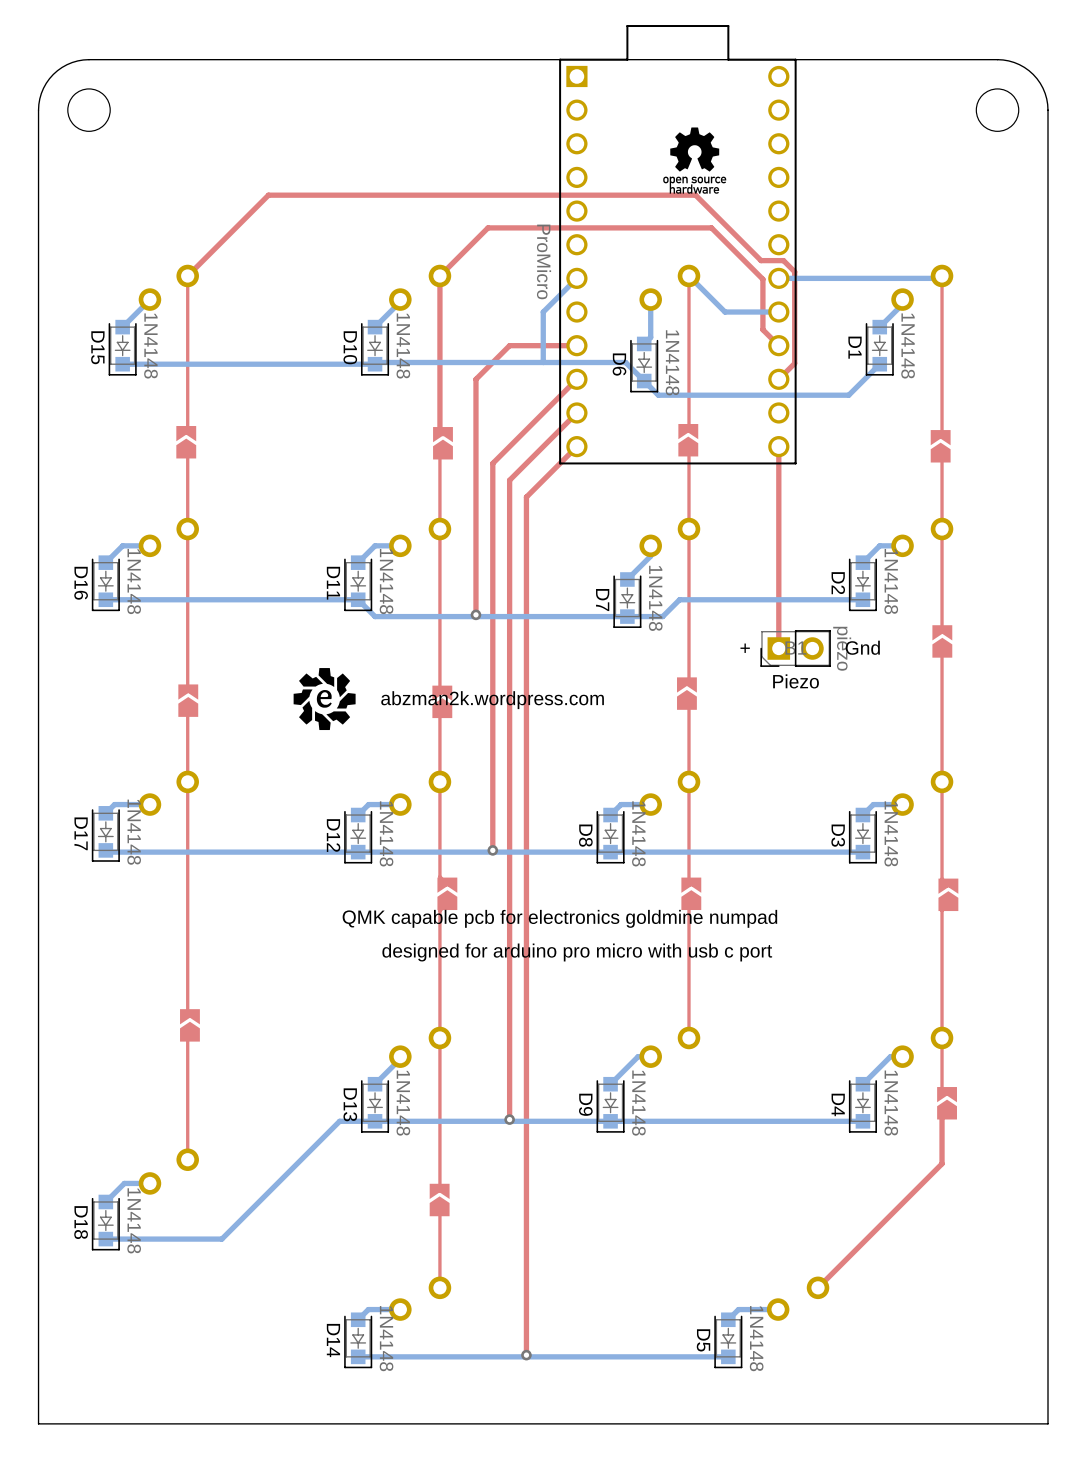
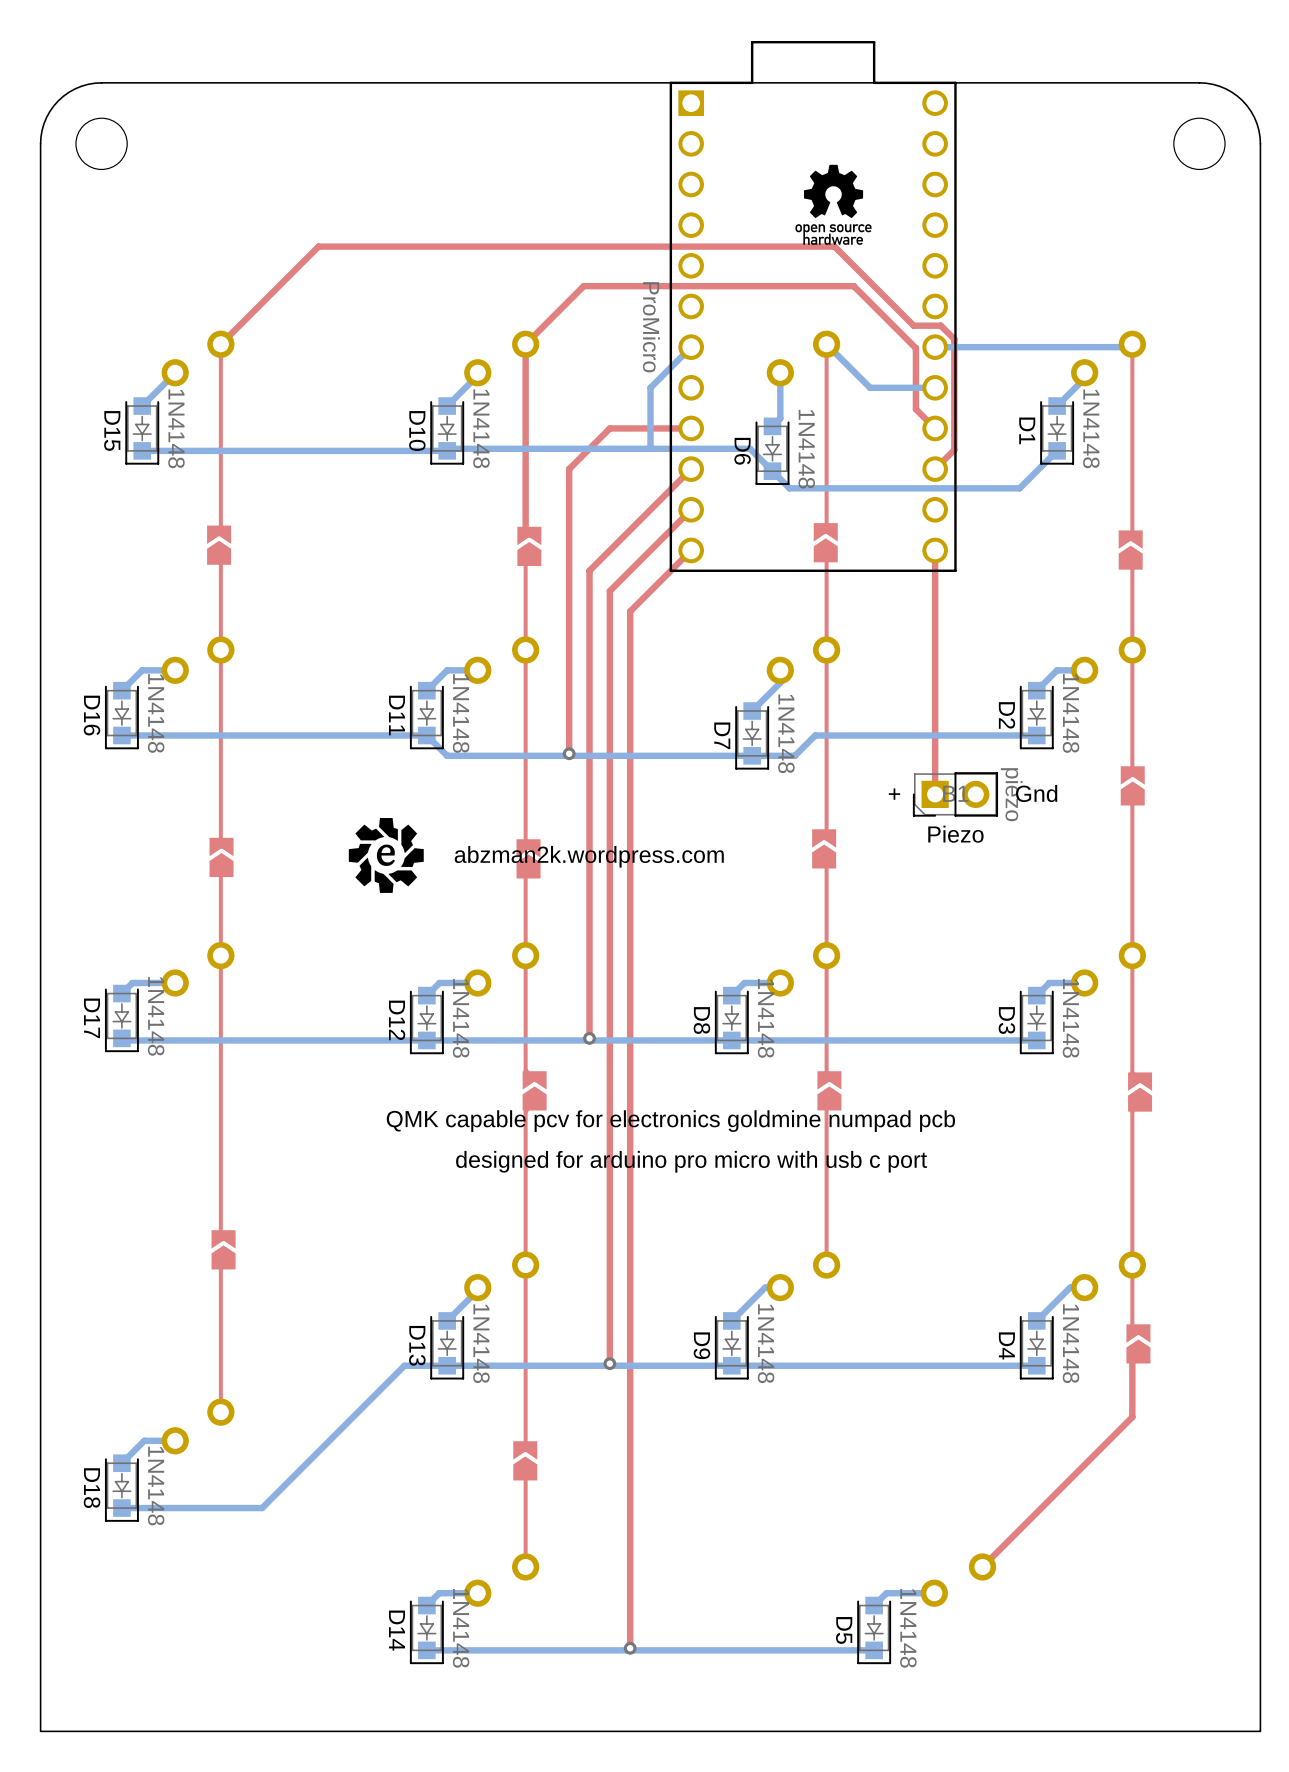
text: QMK capable pcb for electronics goldmine numpad (559, 918) -> QMK capable pcv for electronics goldmine numpad pcb (670, 1121)

